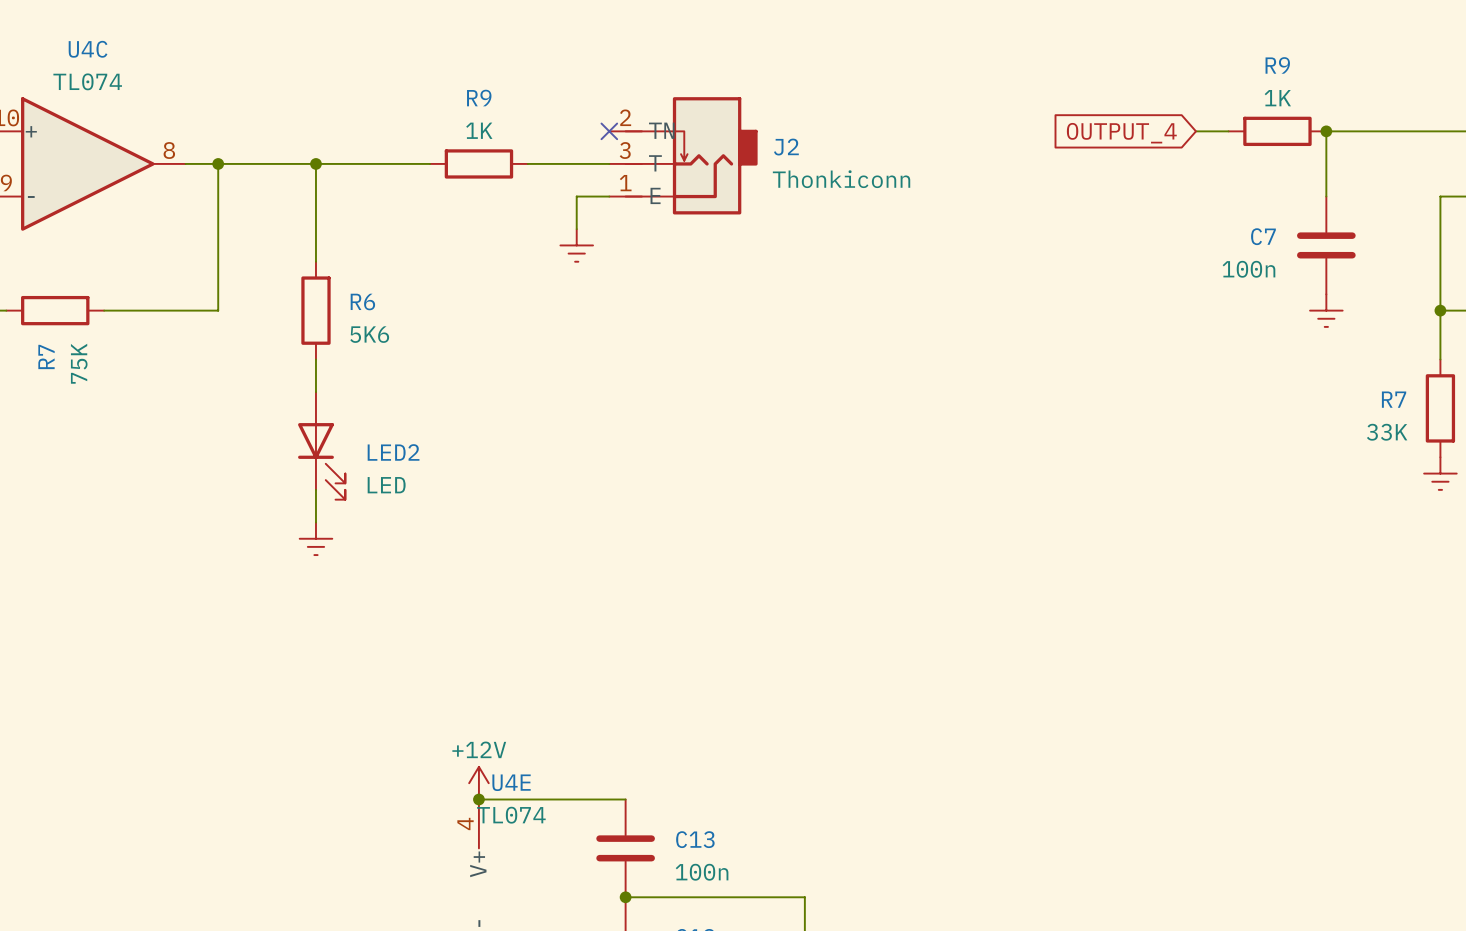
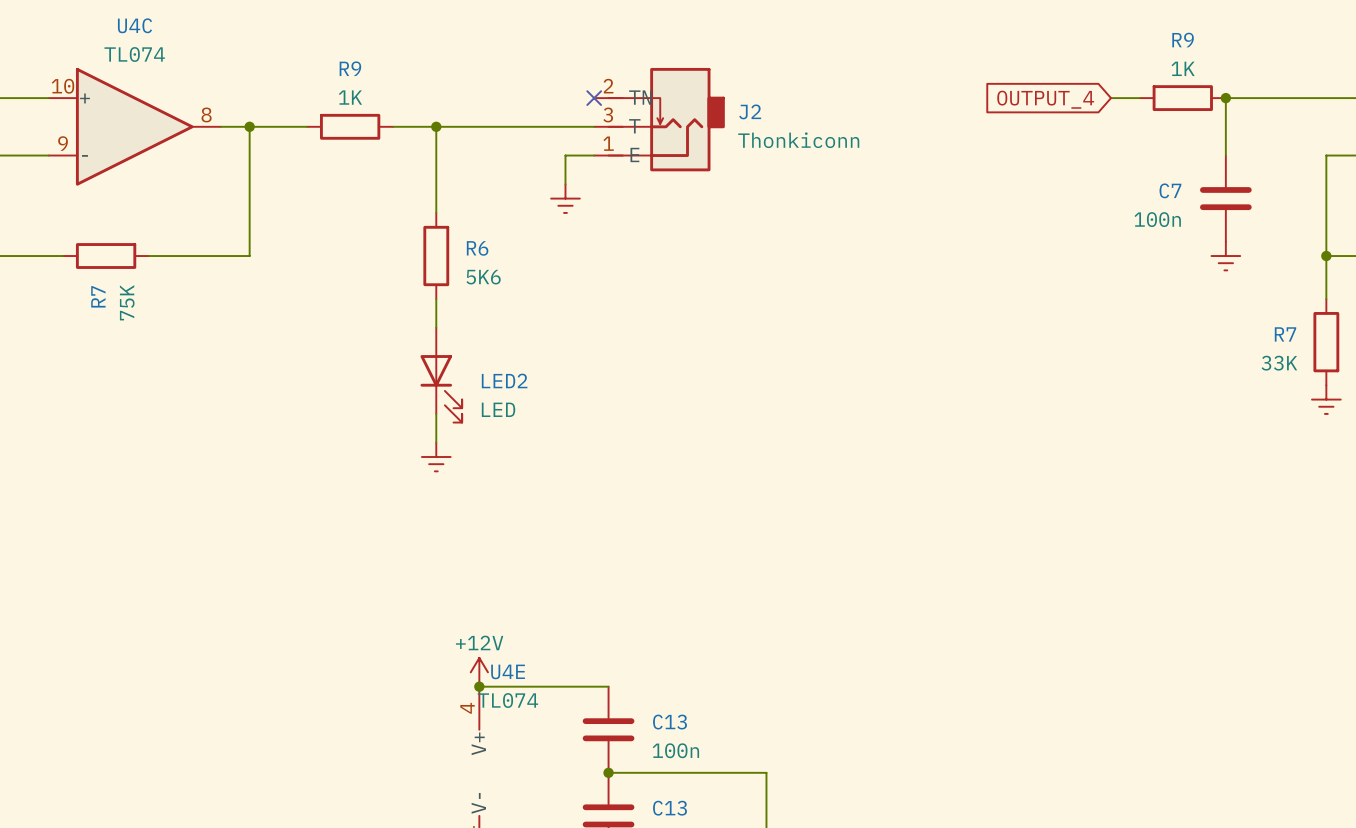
wire: (283, 163) (381, 163) -> none
wire: (315, 163) (315, 261) -> none
junction: (315, 163) -> none
junction: none -> (436, 126)
R9 position: (478, 163) -> (350, 126)
wire: none -> (522, 126) (436, 126) (436, 212)
R6 position: (315, 310) -> (436, 256)
wire: (315, 359) (315, 392) -> (436, 299) (436, 327)
LED2 position: (321, 445) -> (441, 375)
wire: (315, 489) (315, 522) -> (436, 413) (436, 442)
power symbol position: (315, 538) -> (436, 457)

